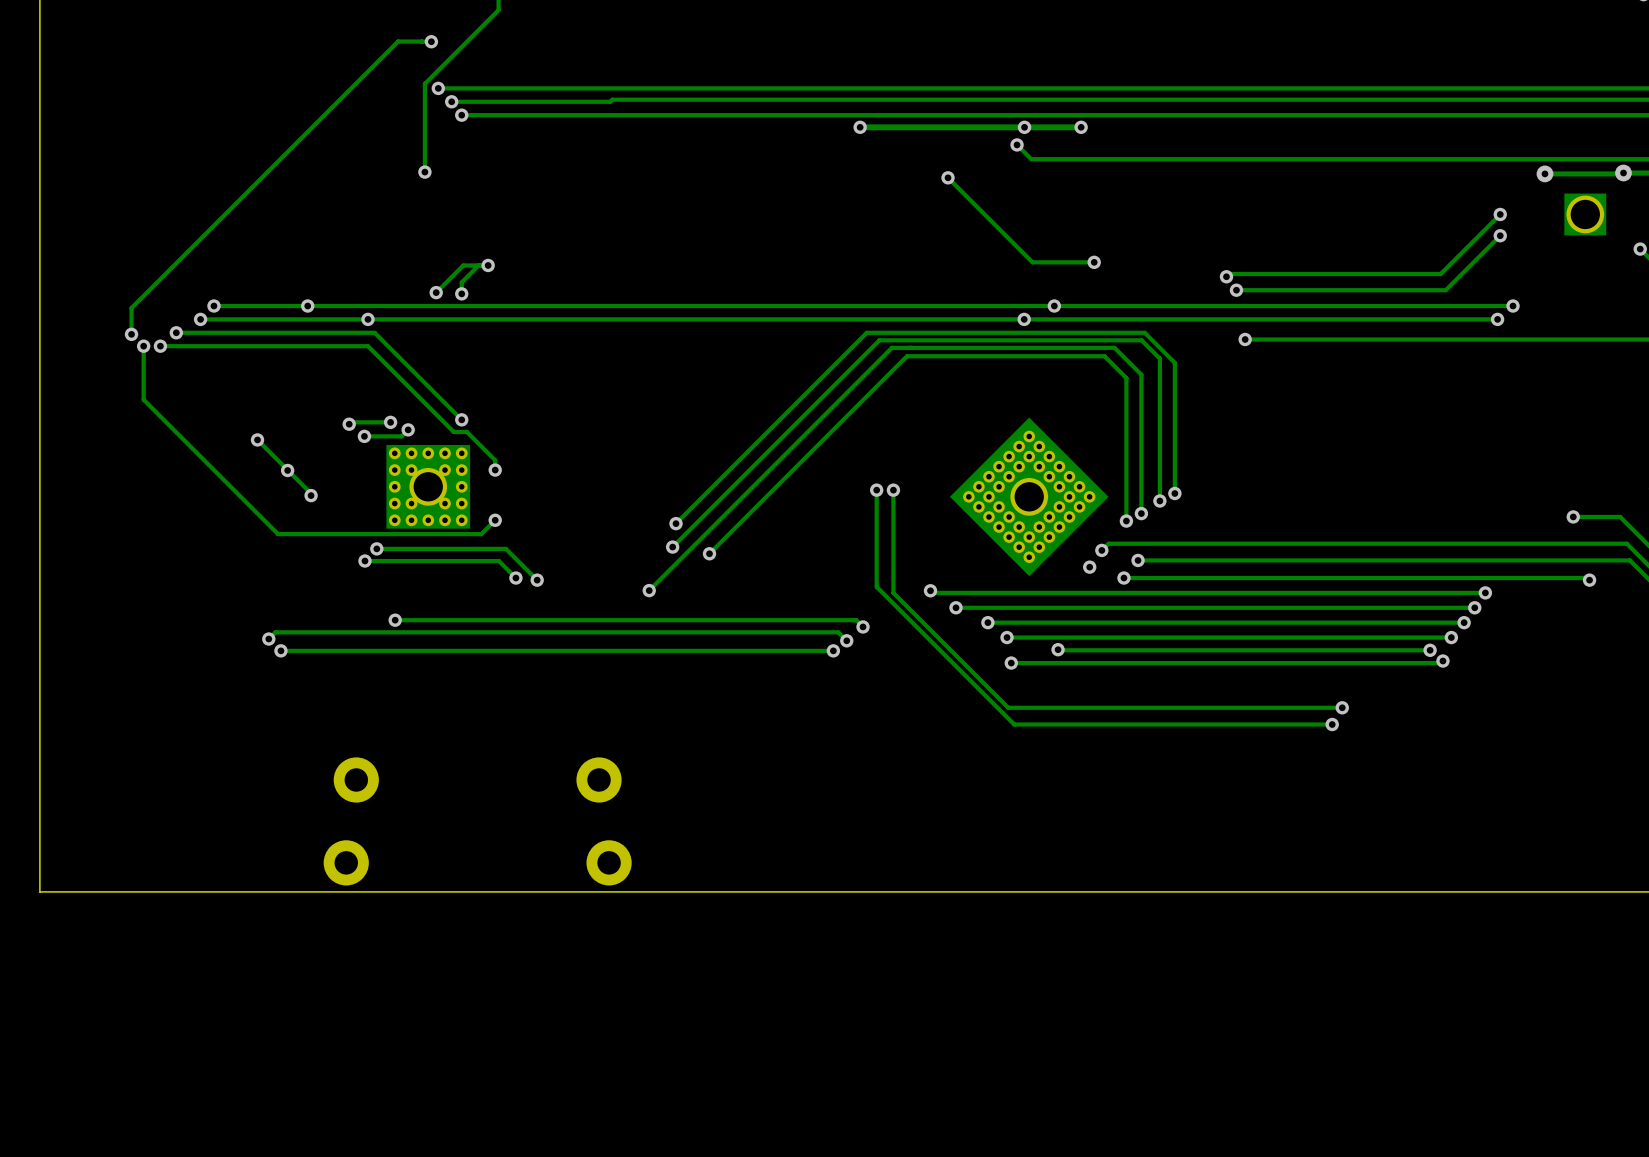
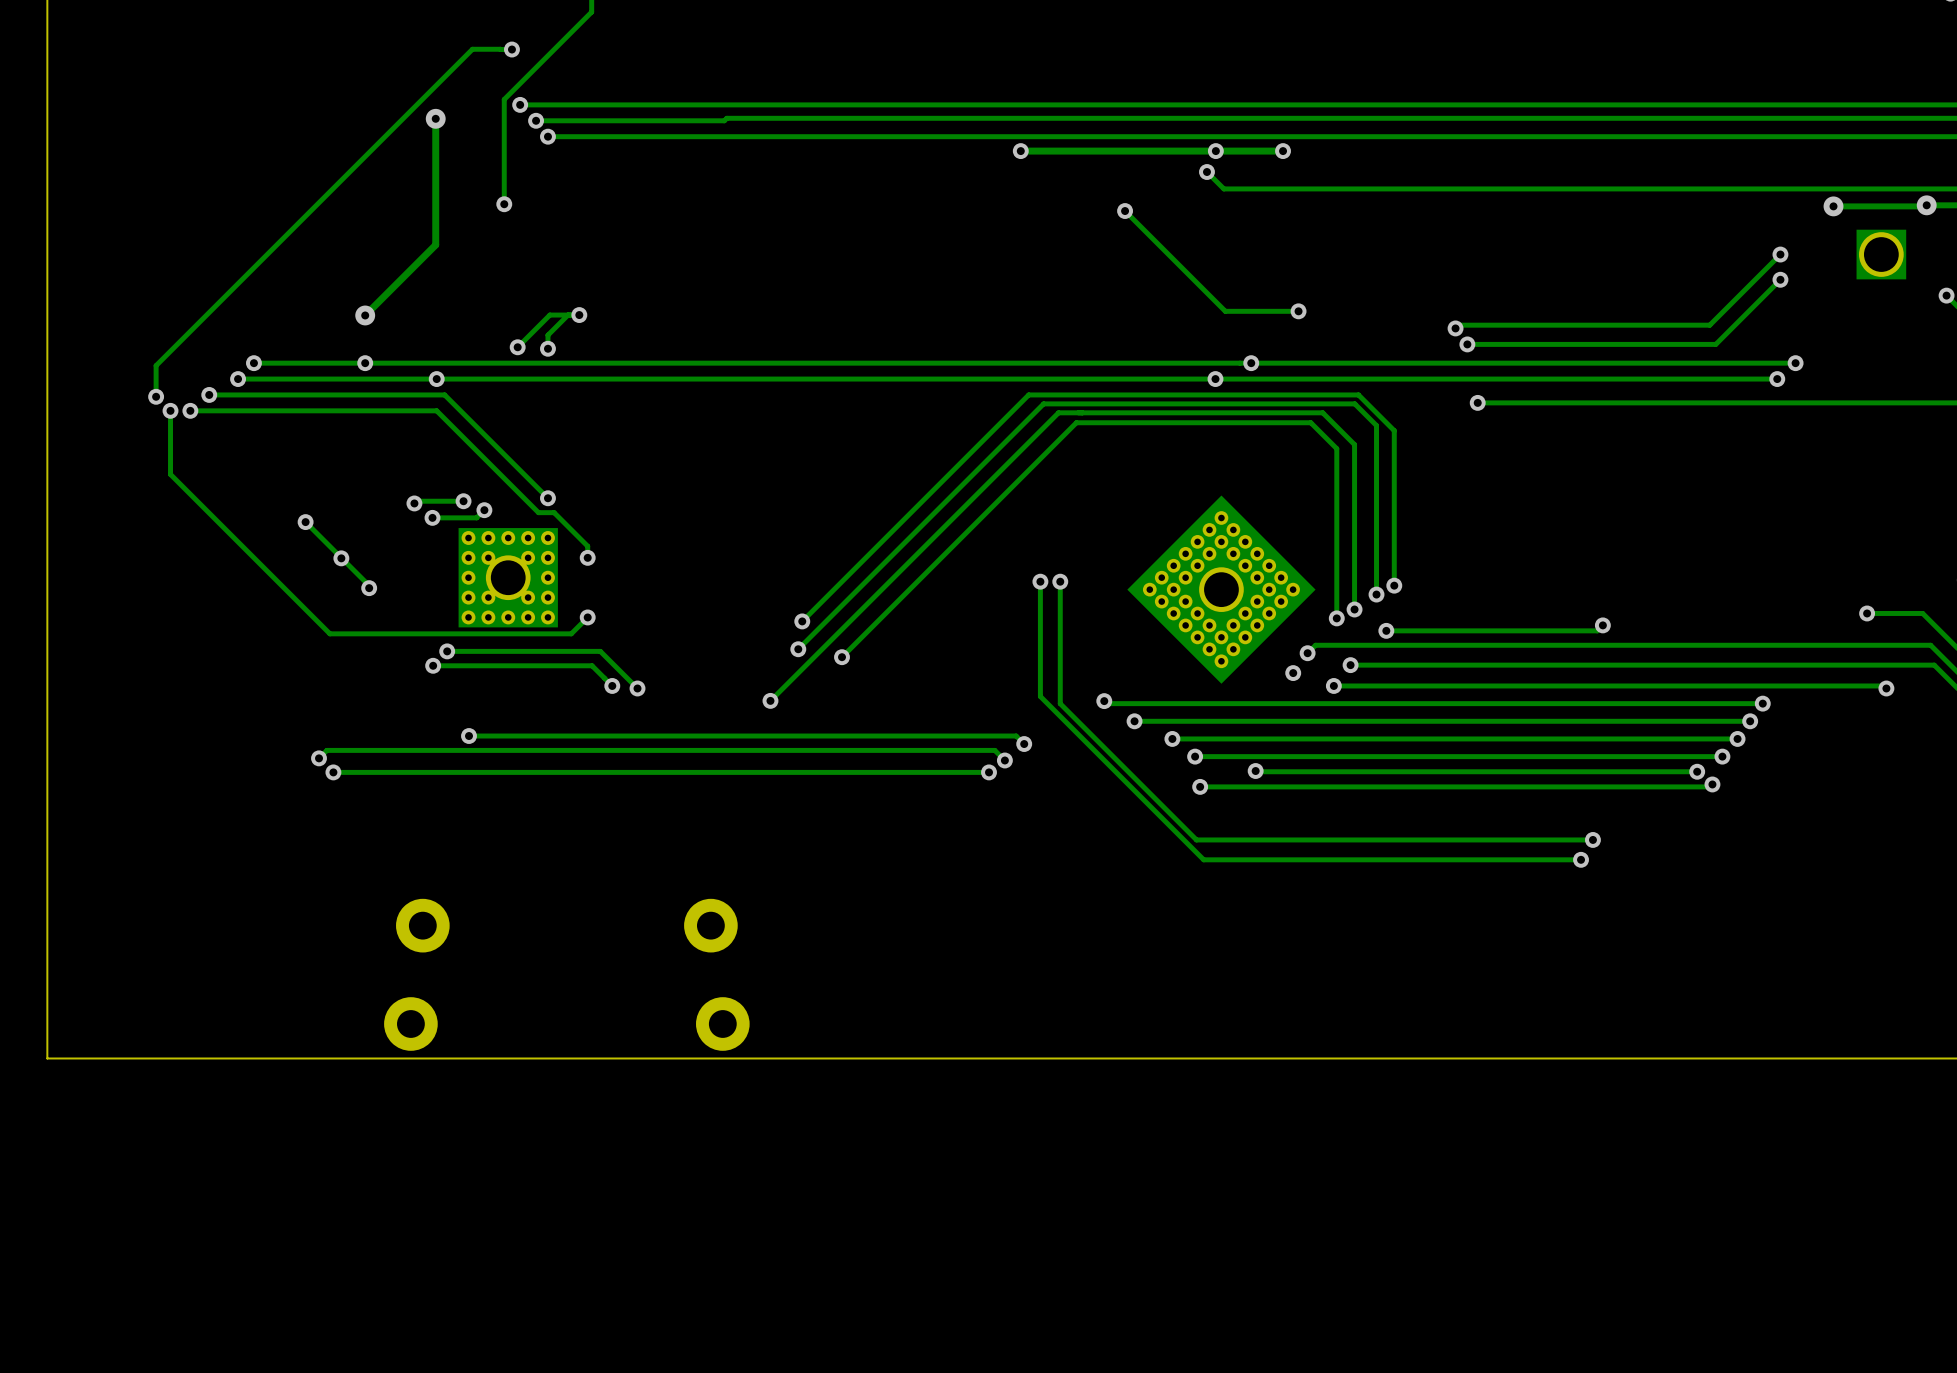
track: none -> (435, 118) (435, 244) (365, 315)
via: none -> (435, 118)
via: none -> (365, 315)
track: none -> (1602, 625) (1597, 630) (1386, 630)
via: none -> (1602, 625)
via: none -> (1386, 630)

